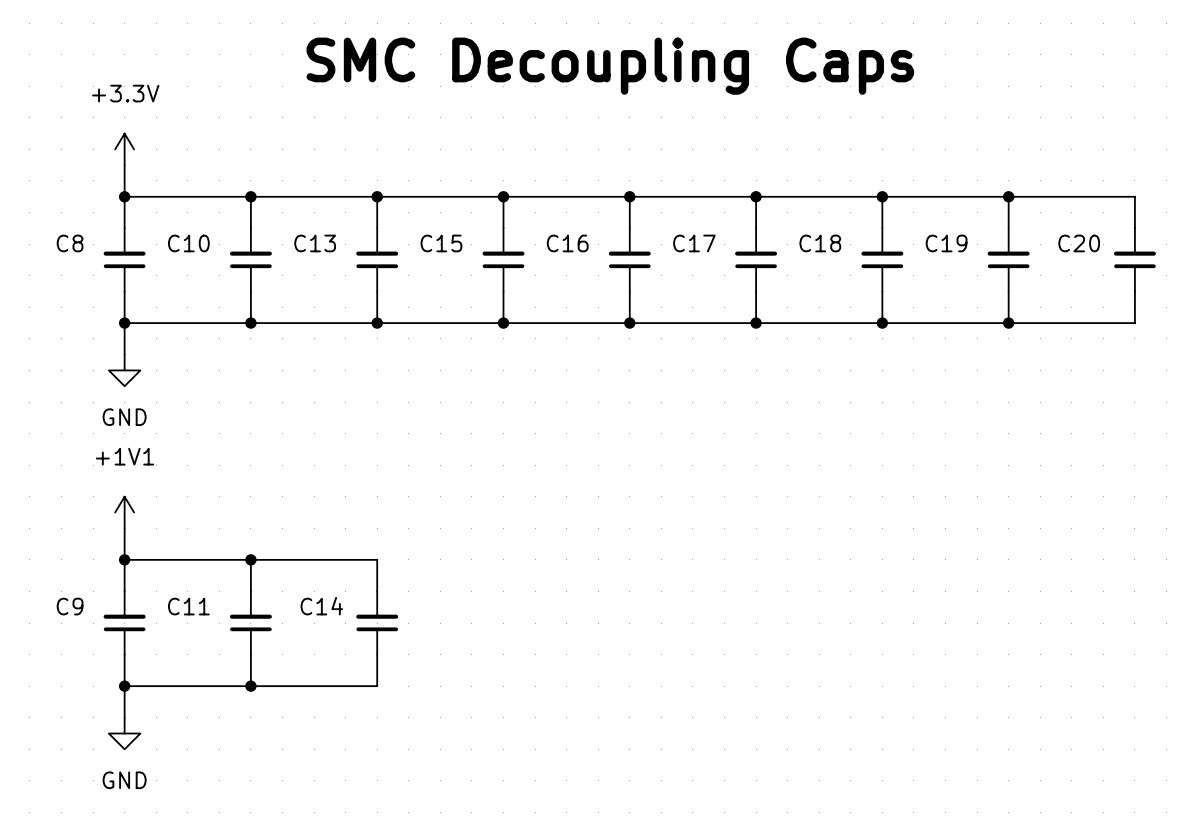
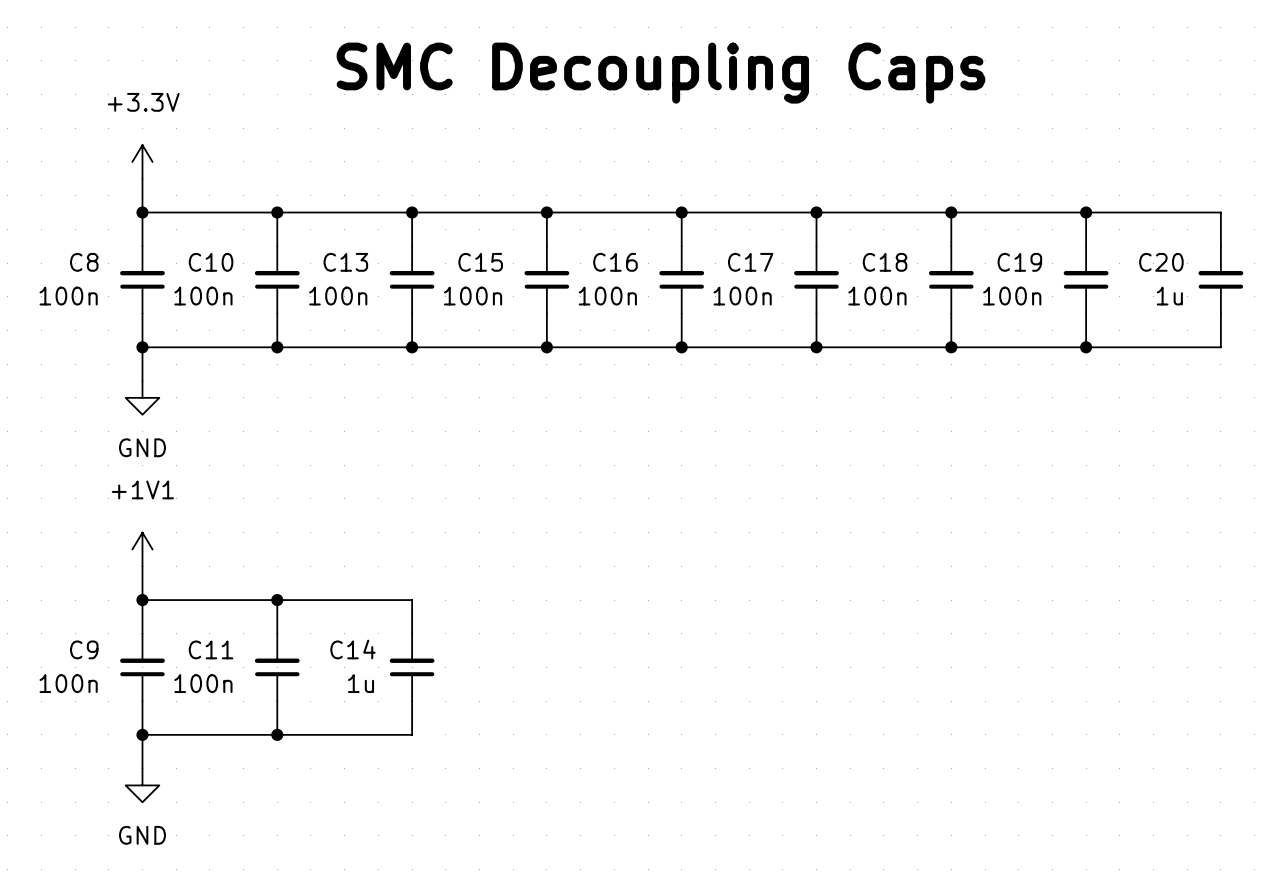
C8 value: none -> 100n (68, 296)
C10 value: none -> 100n (203, 296)
C13 value: none -> 100n (338, 296)
C15 value: none -> 100n (473, 296)
C16 value: none -> 100n (607, 296)
C17 value: none -> 100n (742, 296)
C18 value: none -> 100n (877, 296)
C19 value: none -> 100n (1012, 296)
C20 value: none -> 1u (1169, 296)
C9 value: none -> 100n (68, 683)
C11 value: none -> 100n (203, 683)
C14 value: none -> 1u (361, 683)

